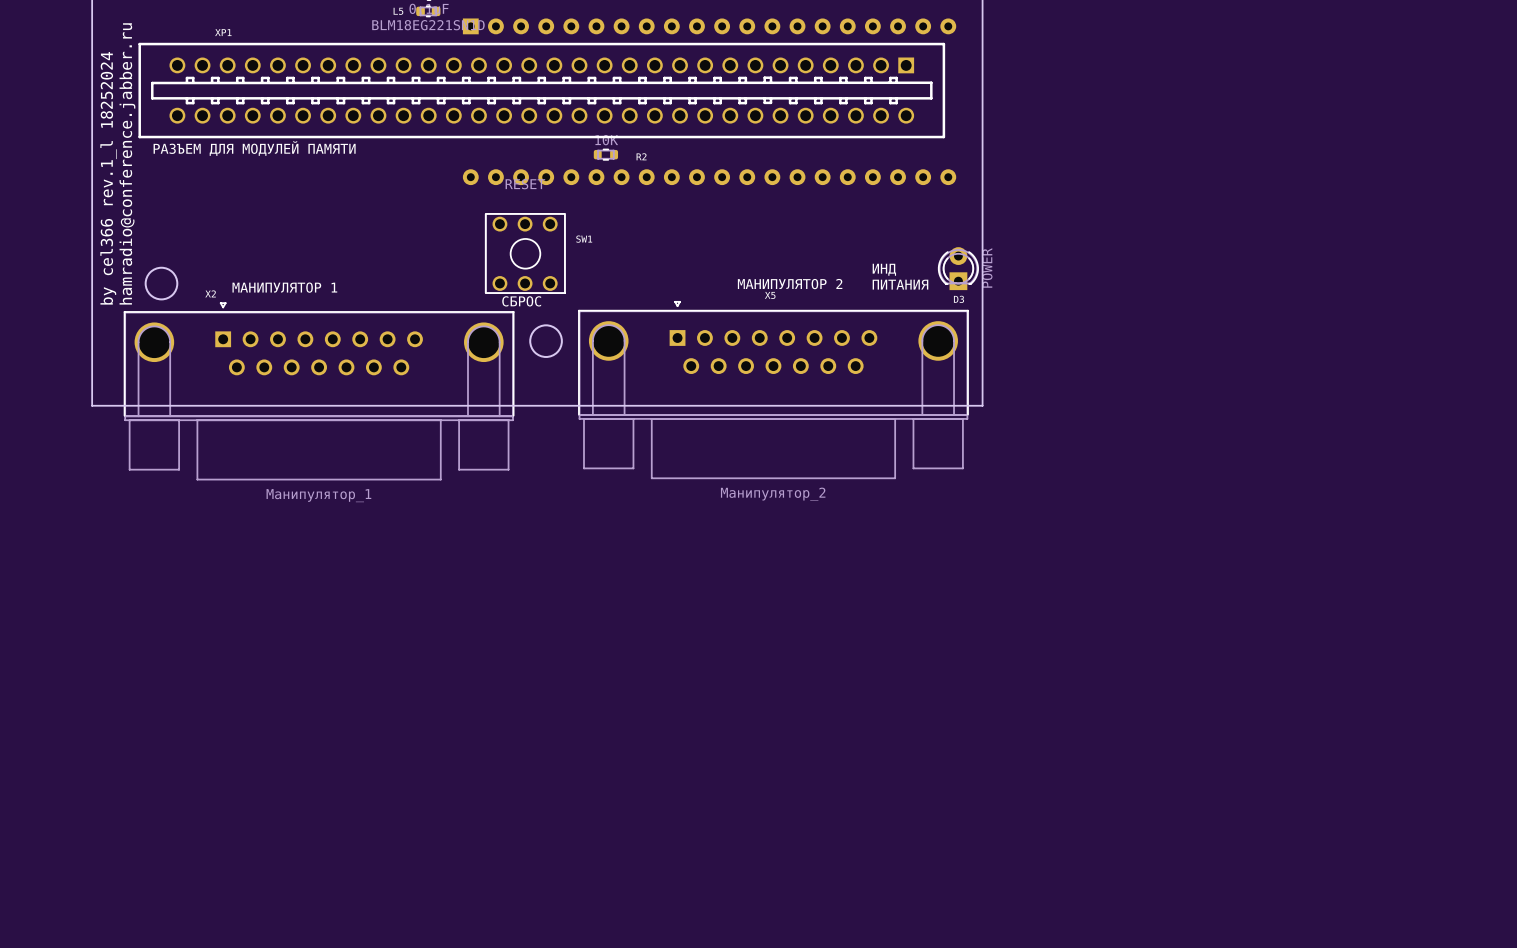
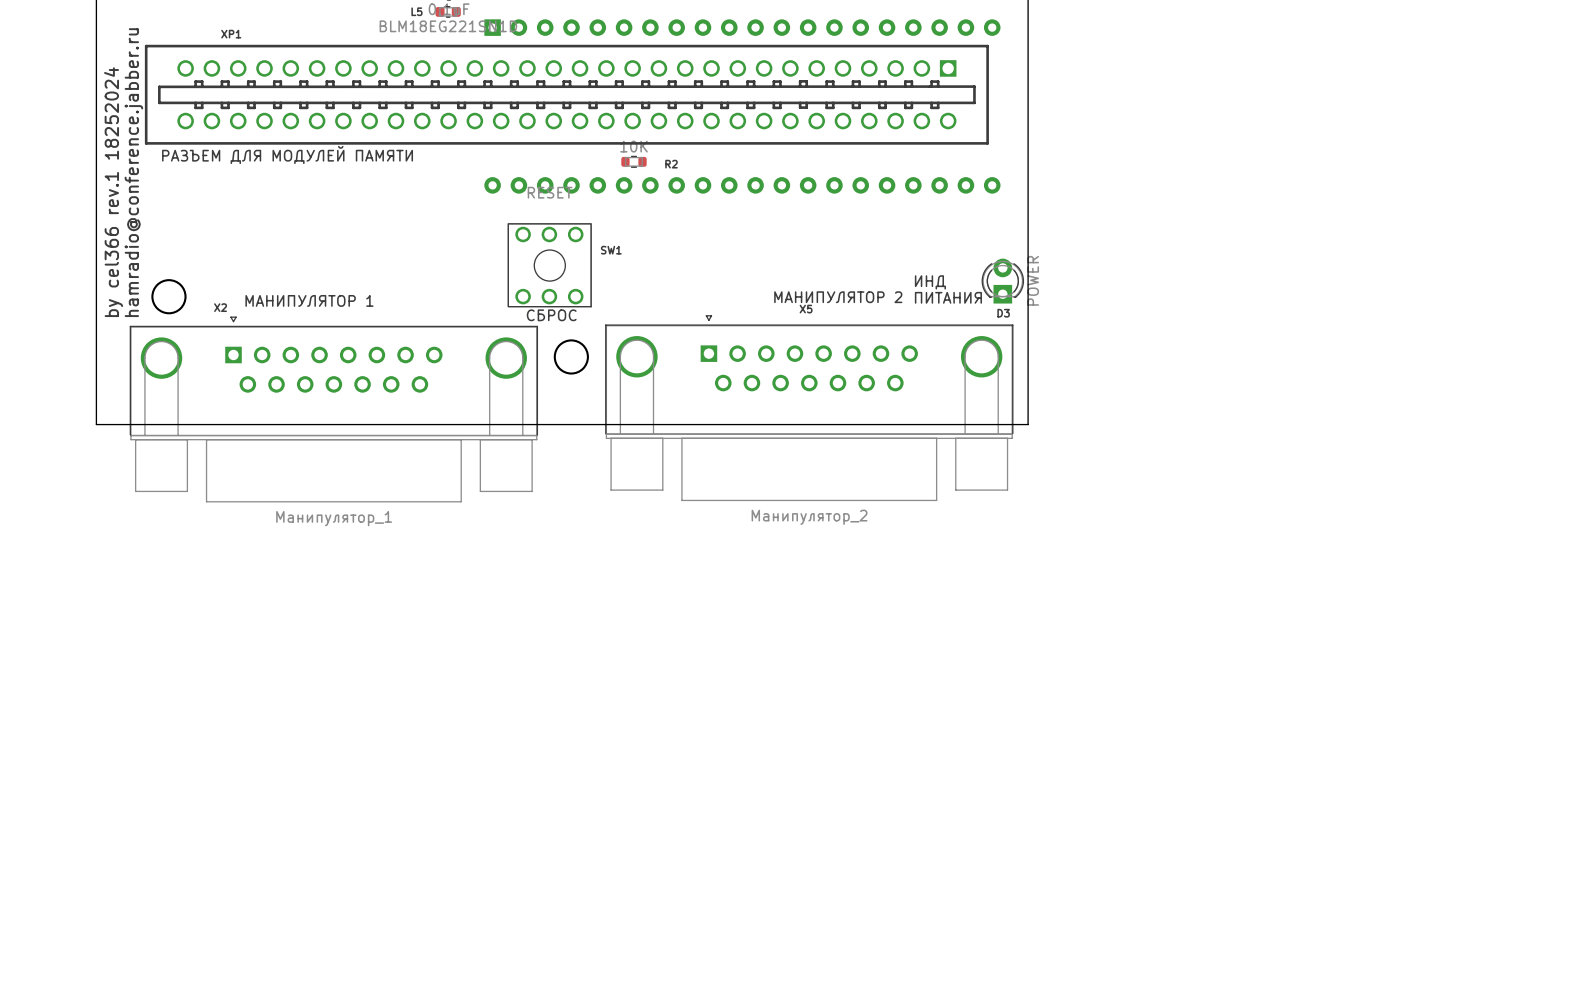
text: by cel366 rev.1_l 18252024 (108, 178) -> by cel366 rev.1 18252024 (113, 192)

